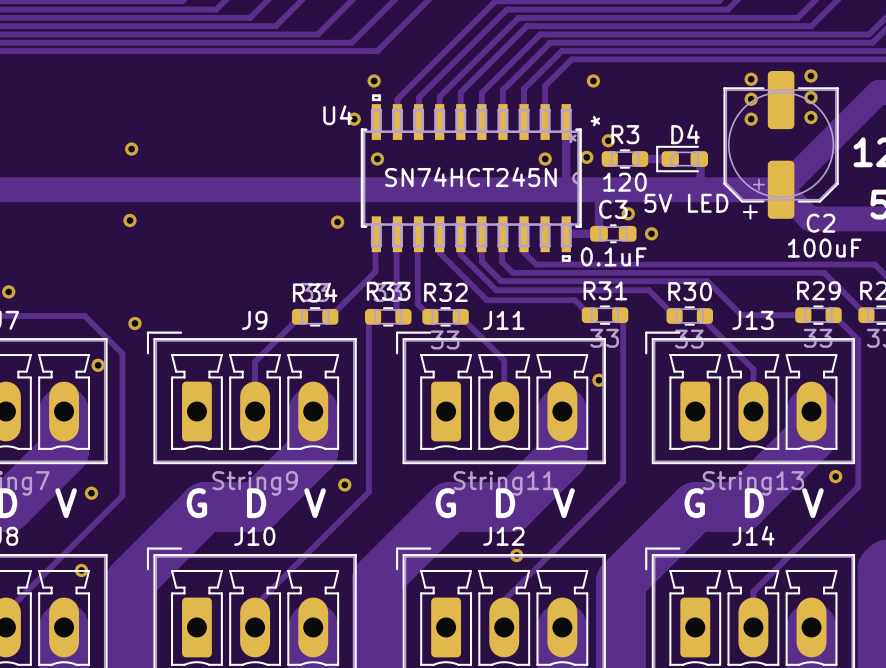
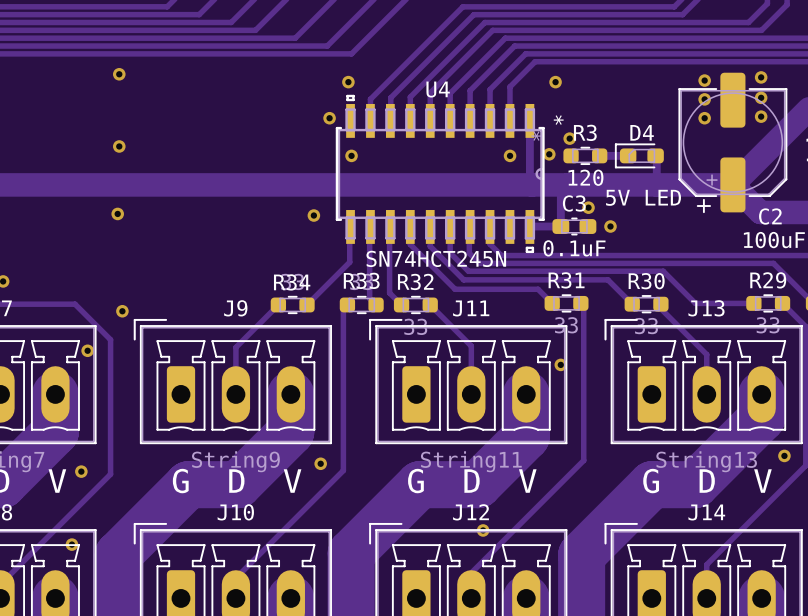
via: none -> (119, 74)
U4 name position: U4 (337, 115) -> U4 (438, 89)
U4 value position: SN74HCT245N (470, 177) -> SN74HCT245N (436, 258)

